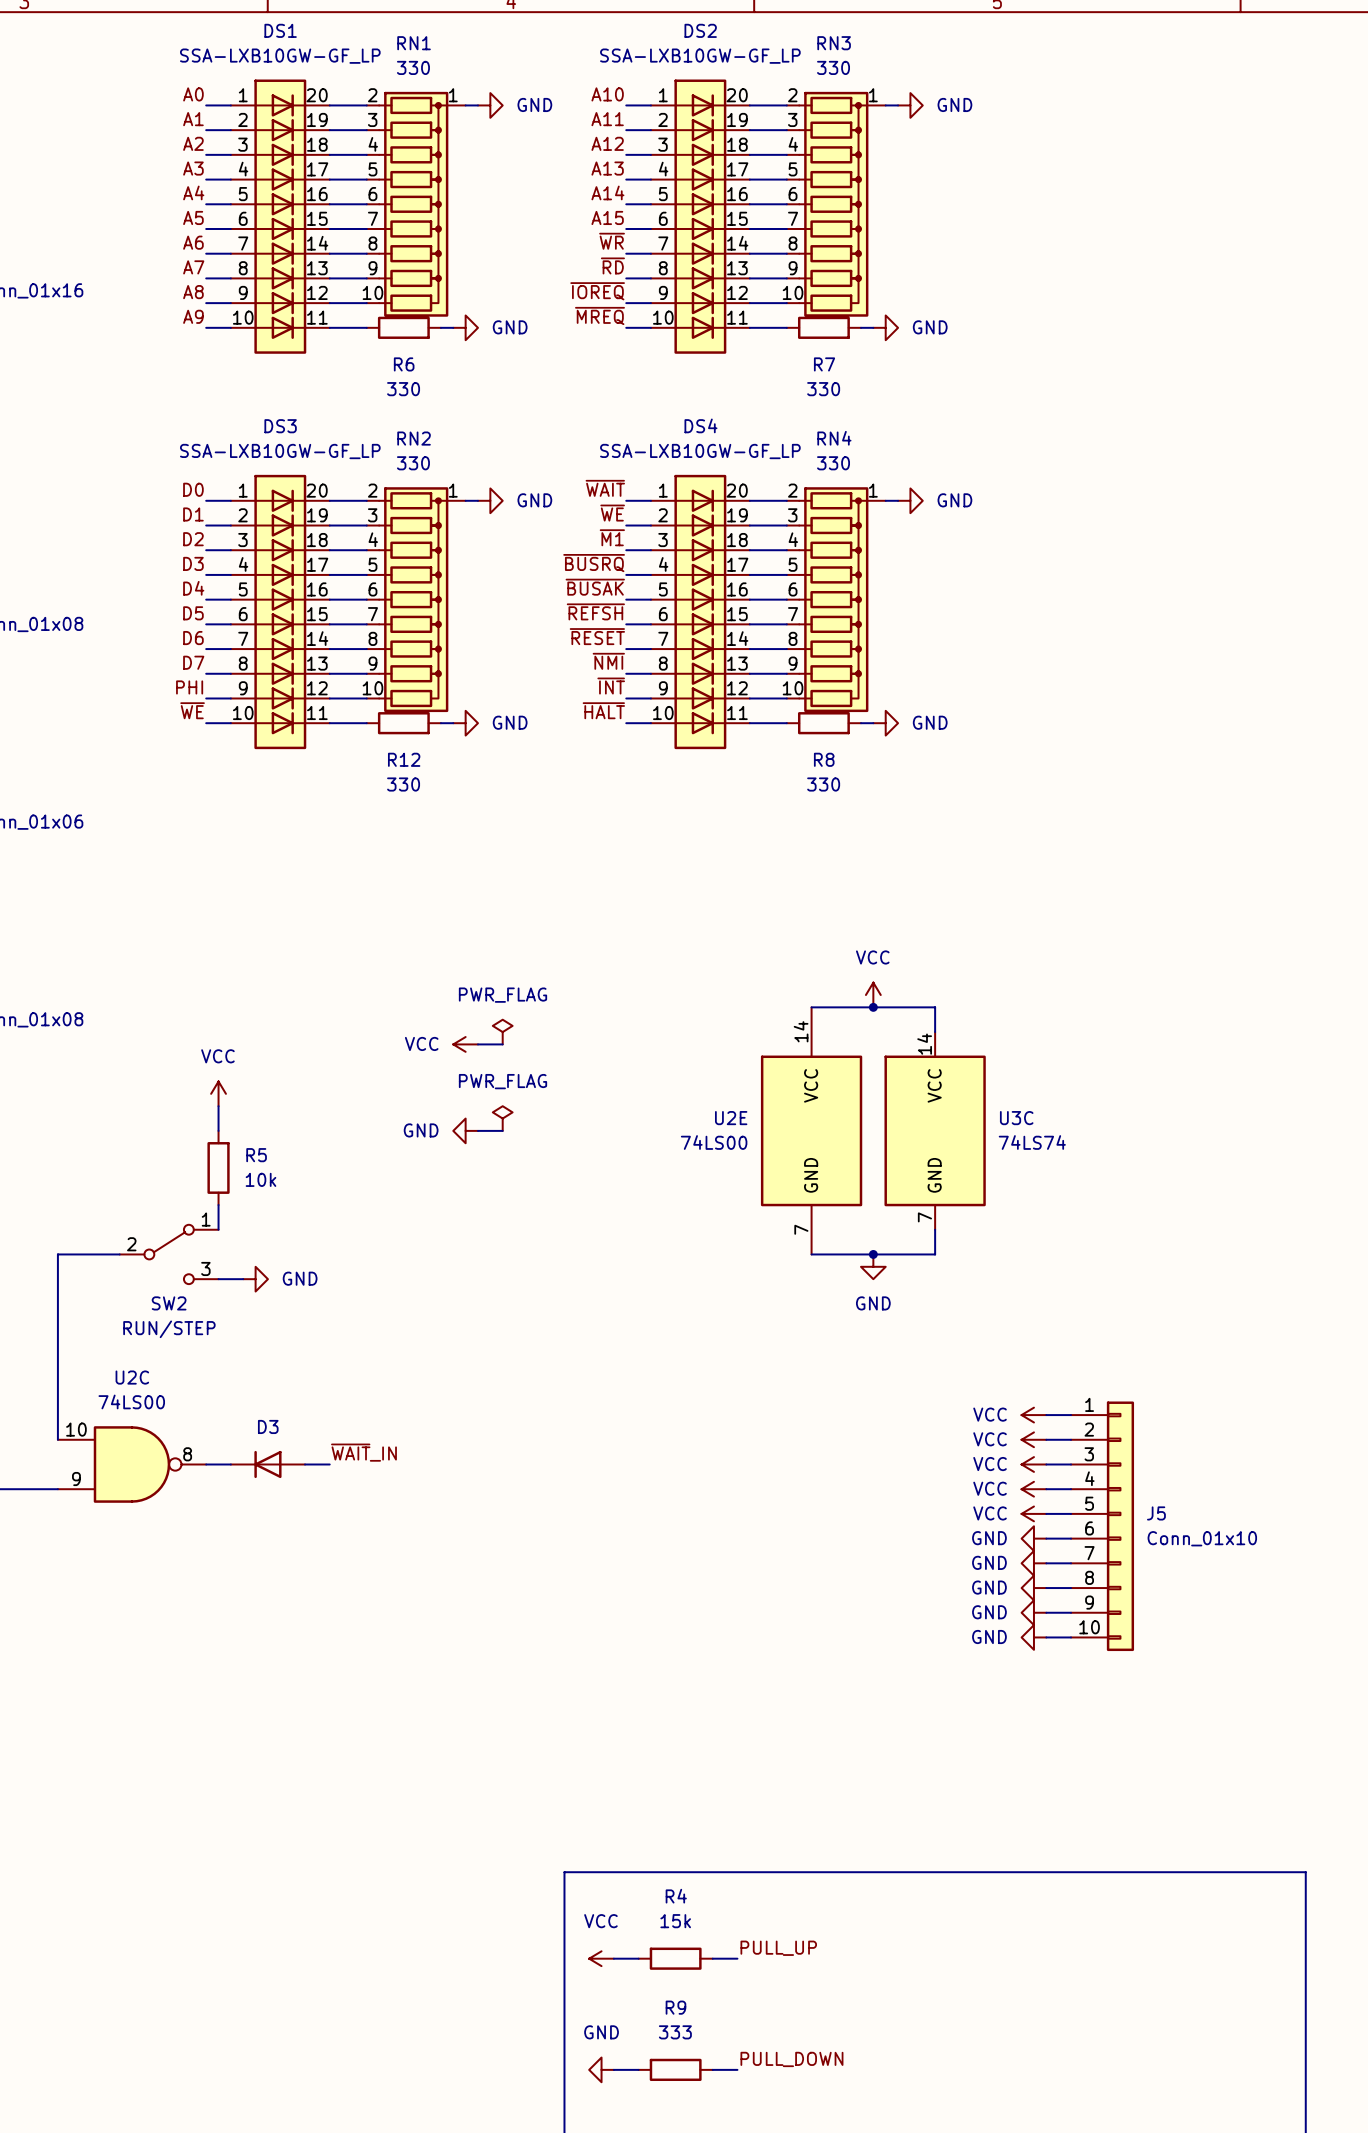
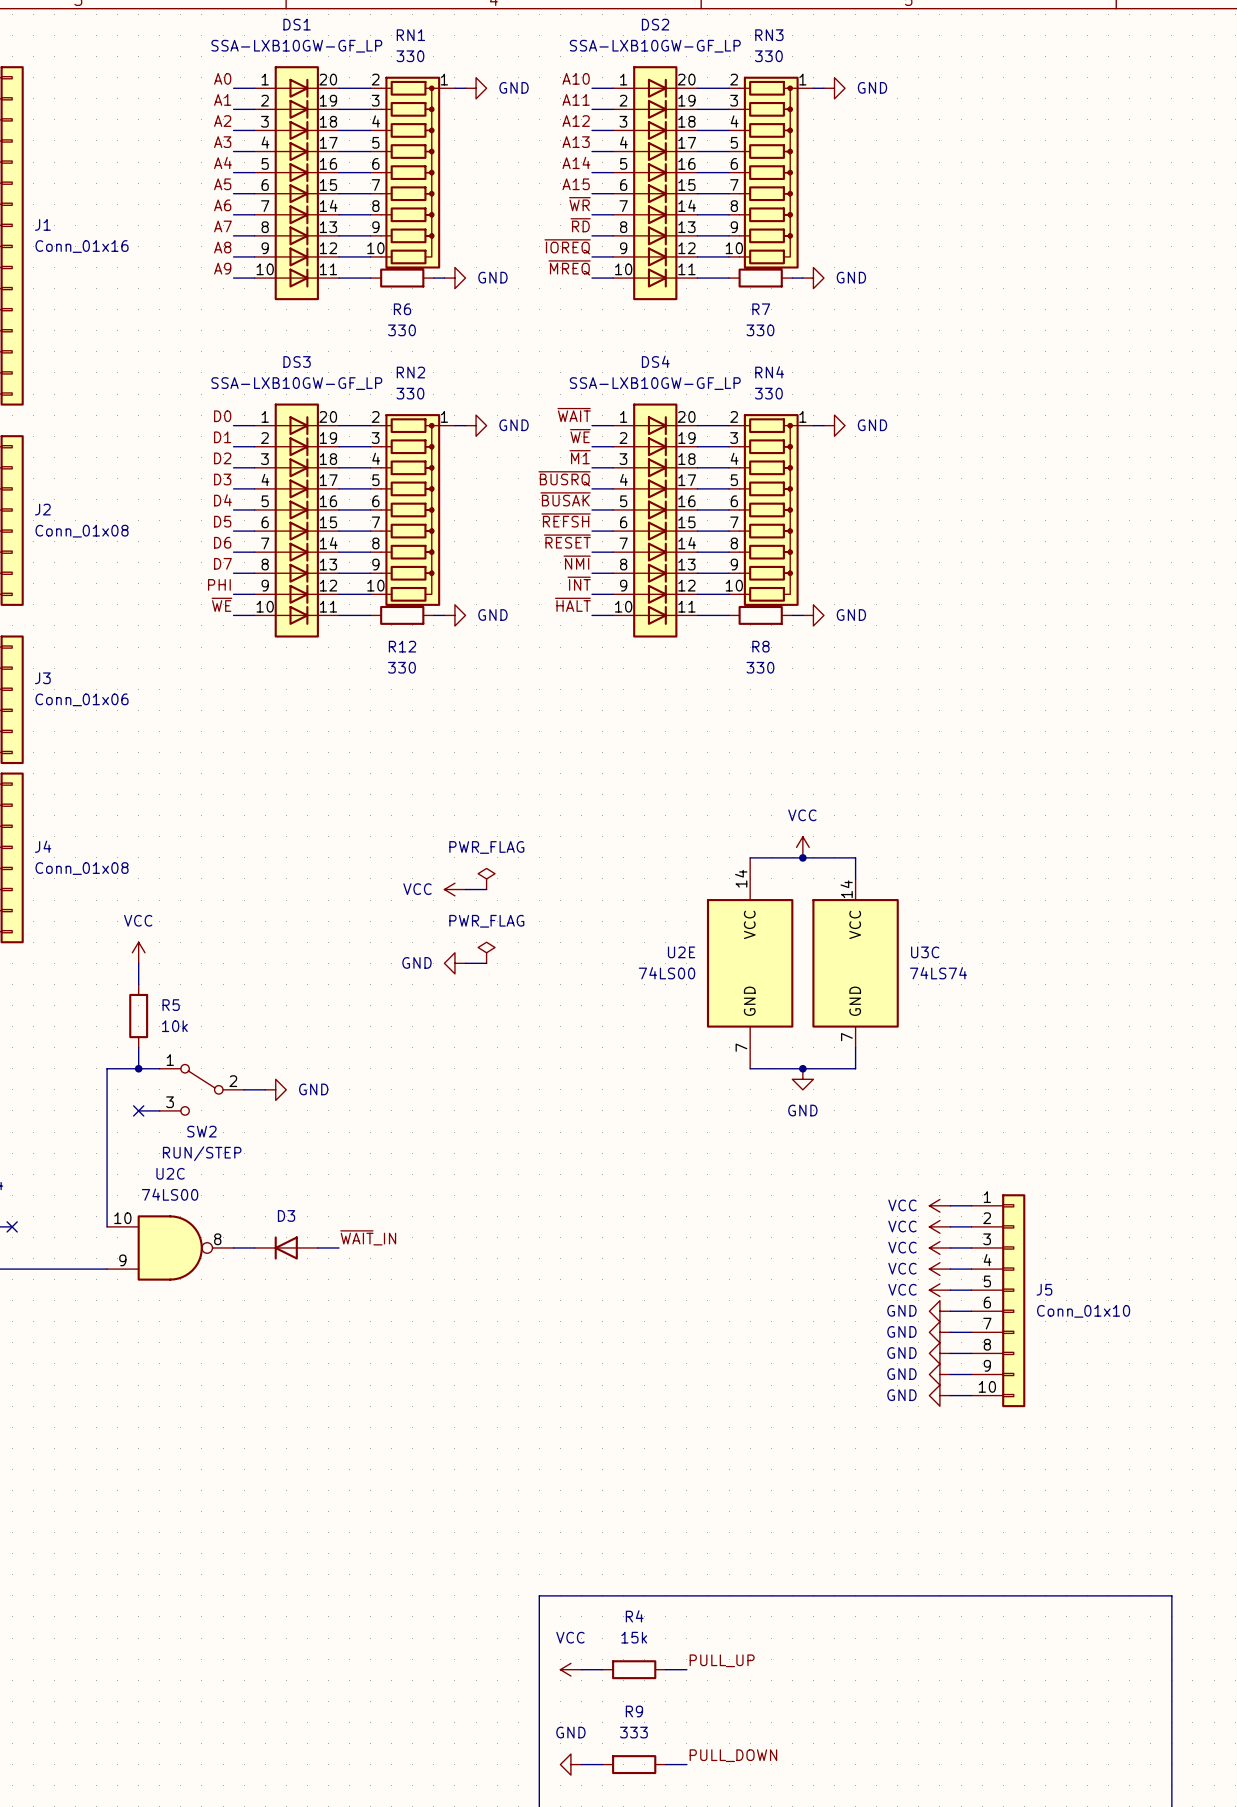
power symbol position: VCC (218, 1093) -> VCC (138, 952)
wire: (218, 1106) (218, 1130) -> (138, 963) (138, 984)
R5 position: (218, 1167) -> (138, 1016)
wire: (218, 1205) (218, 1229) -> (138, 1047) (138, 1068)
junction: none -> (138, 1068)
SW2 flip: as is (169, 1254) -> left-right (201, 1089)
wire: none -> (138, 1110) (159, 1110)
no-connect mark: none -> (138, 1110)

